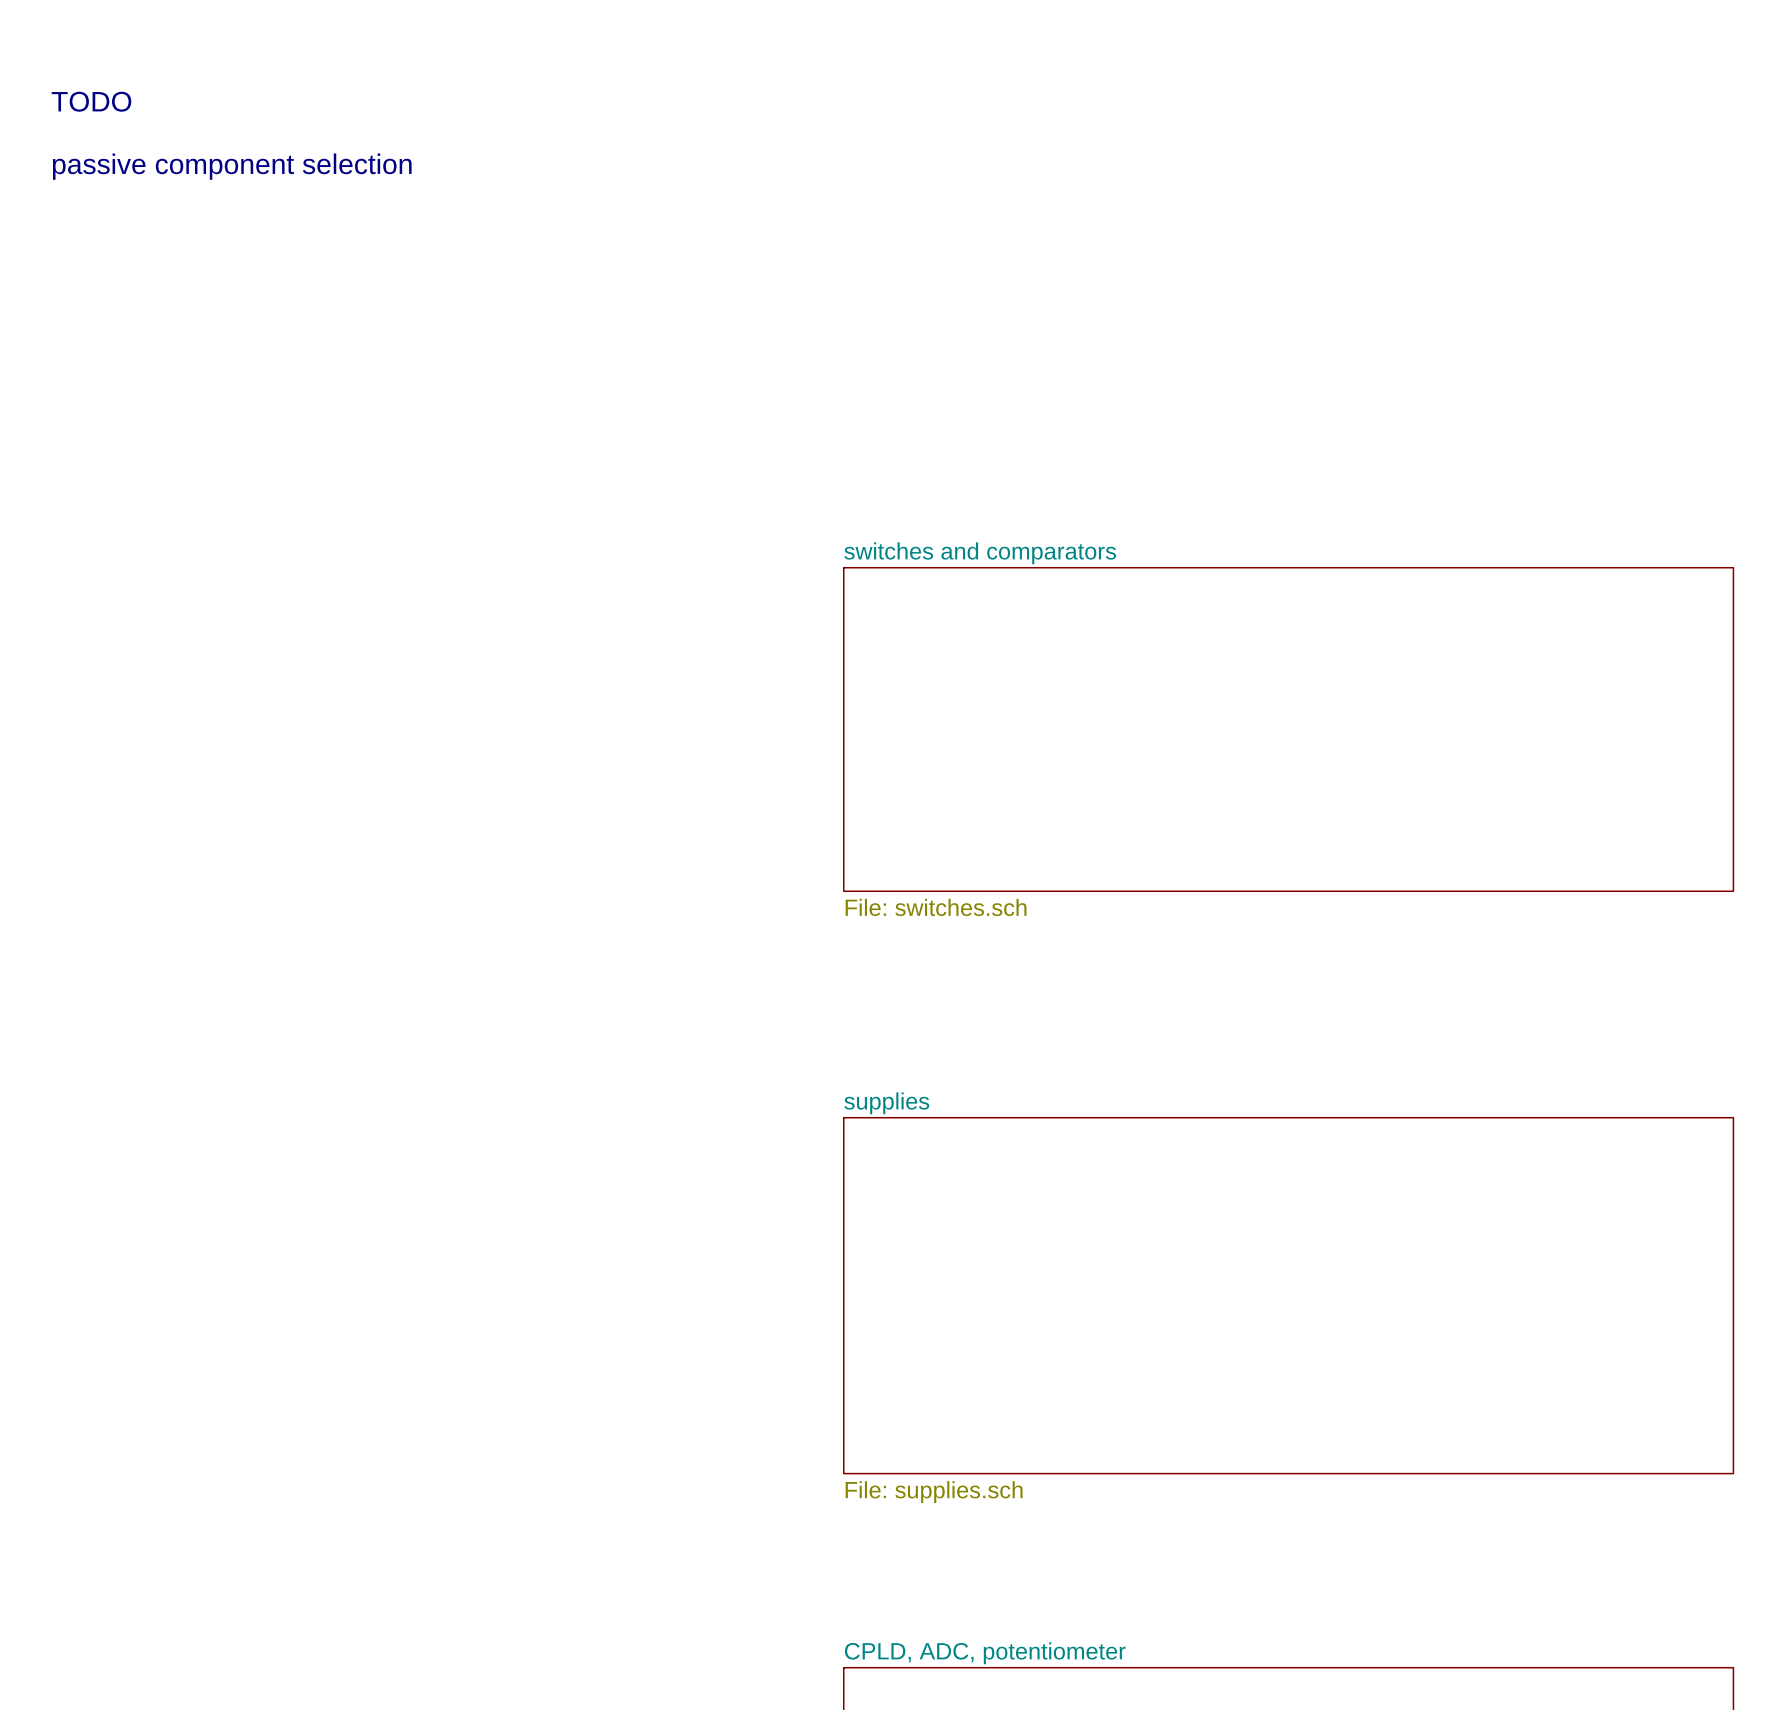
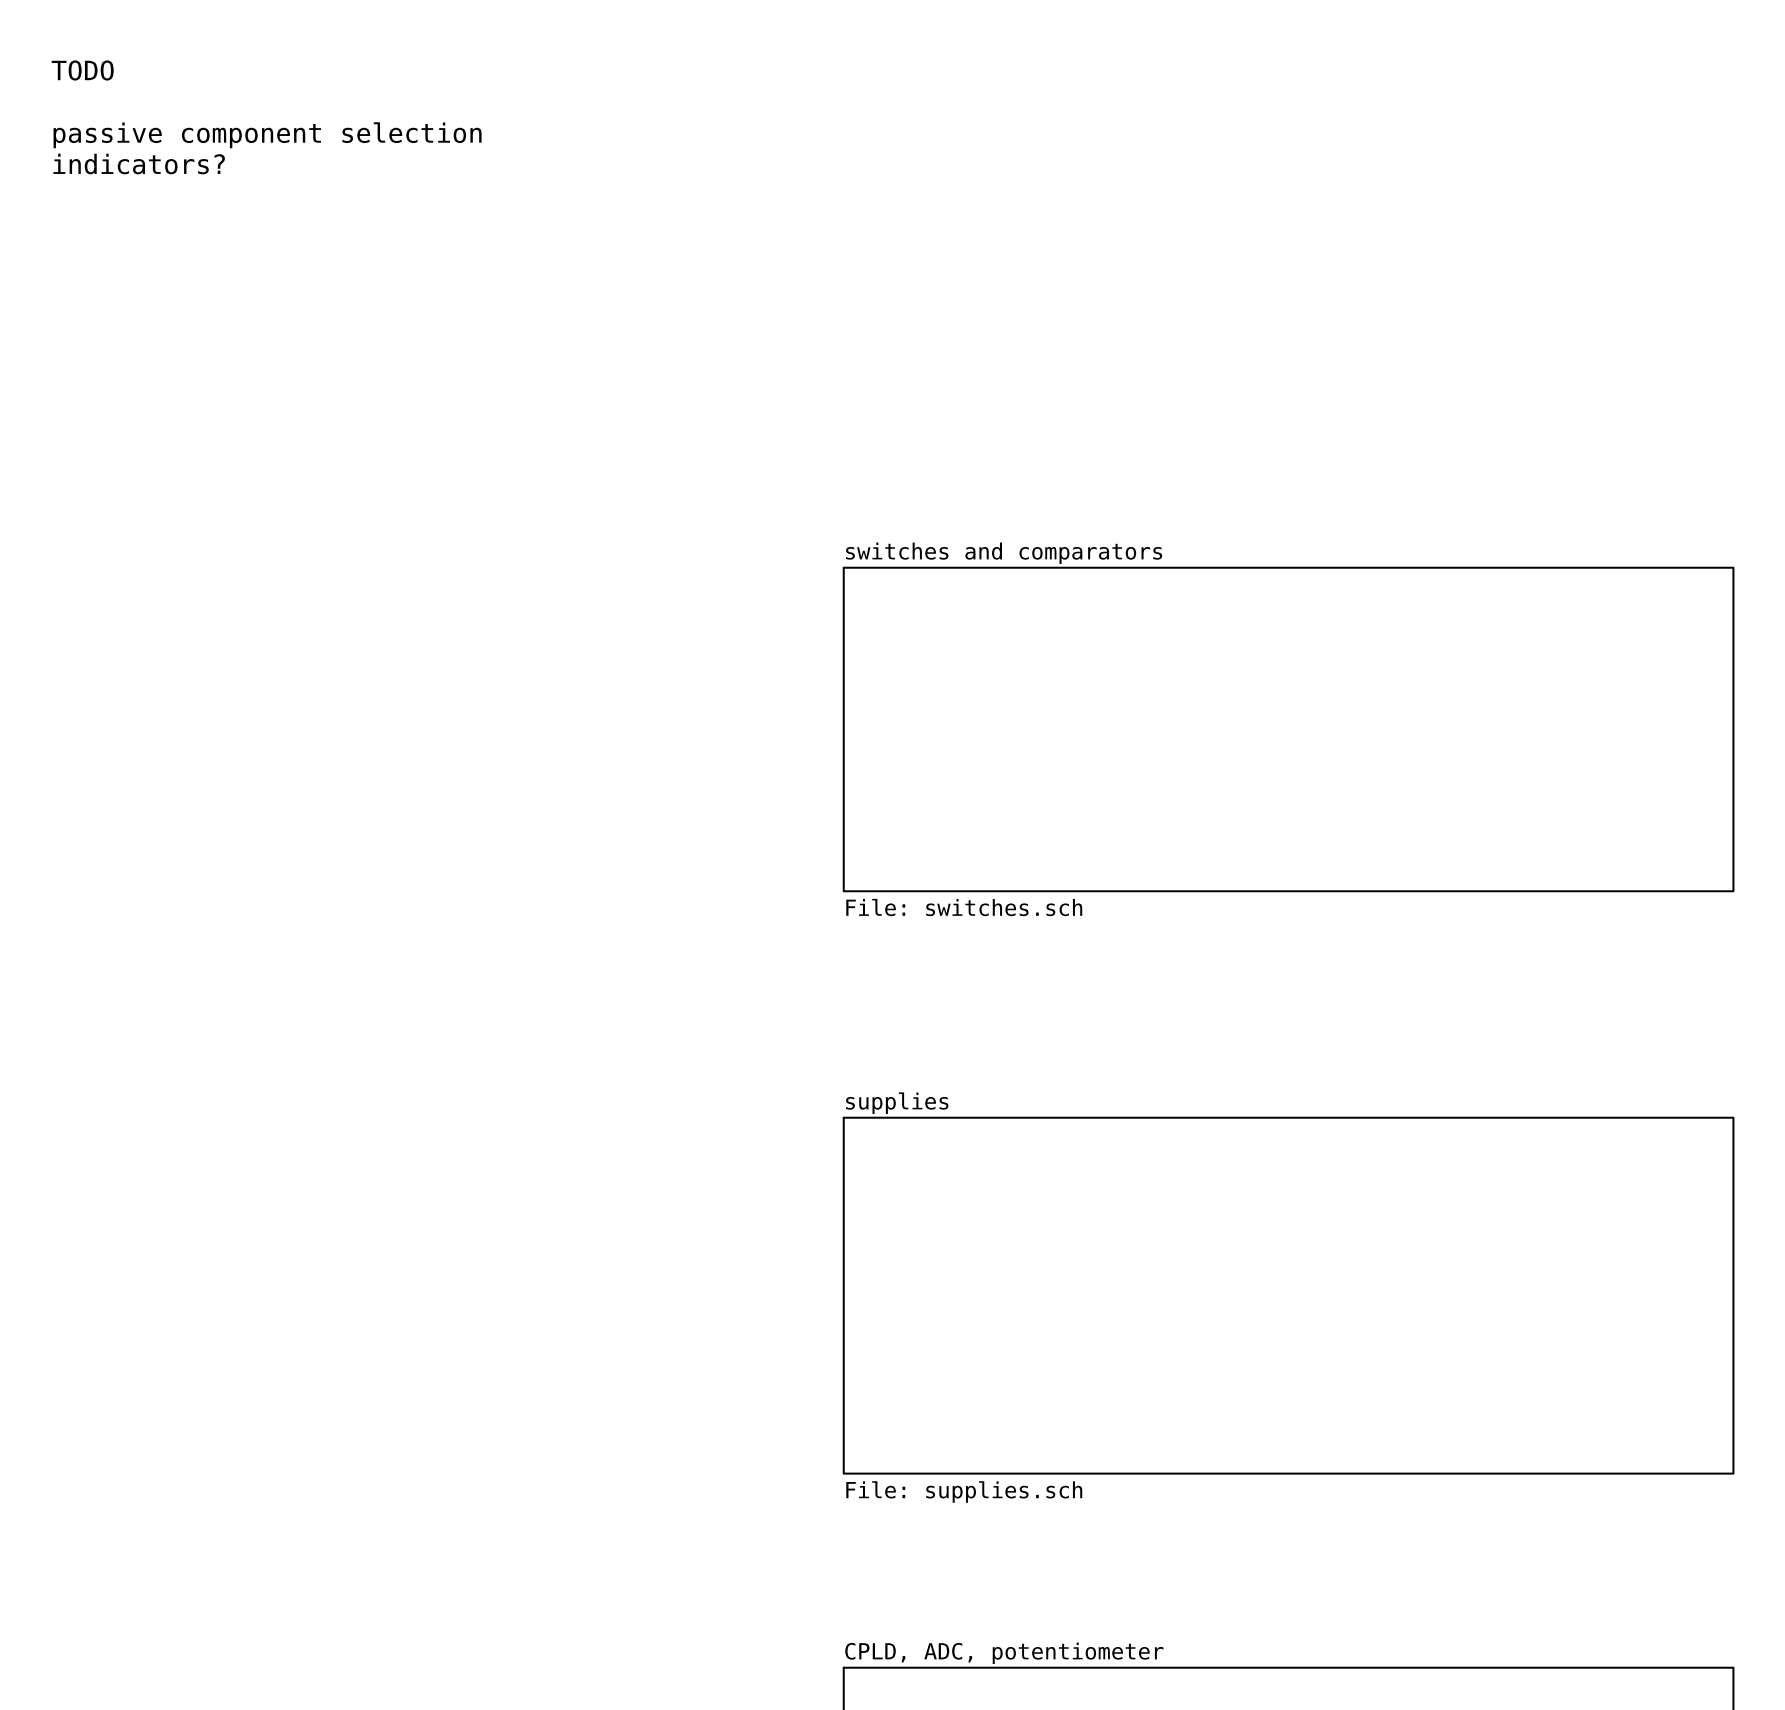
text position: TODO (91, 101) -> TODO (82, 70)
text: none -> passive component selection (267, 135)
text: passive component selection (232, 166) -> indicators? (139, 164)

